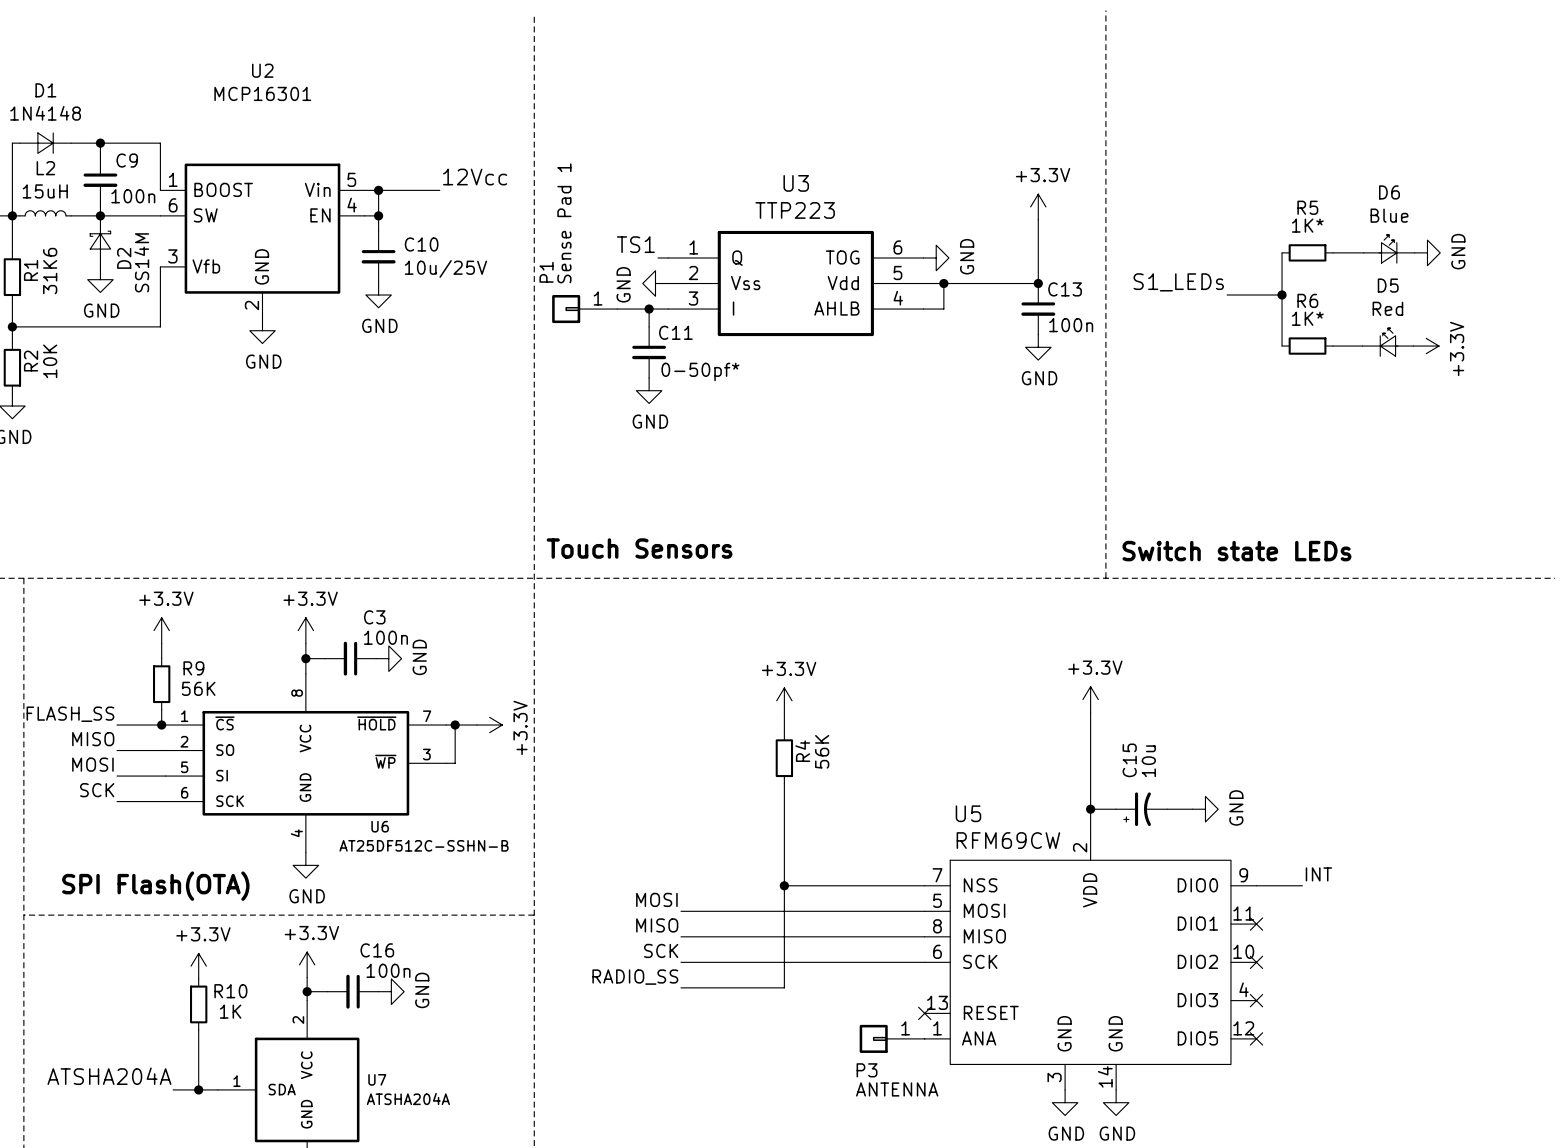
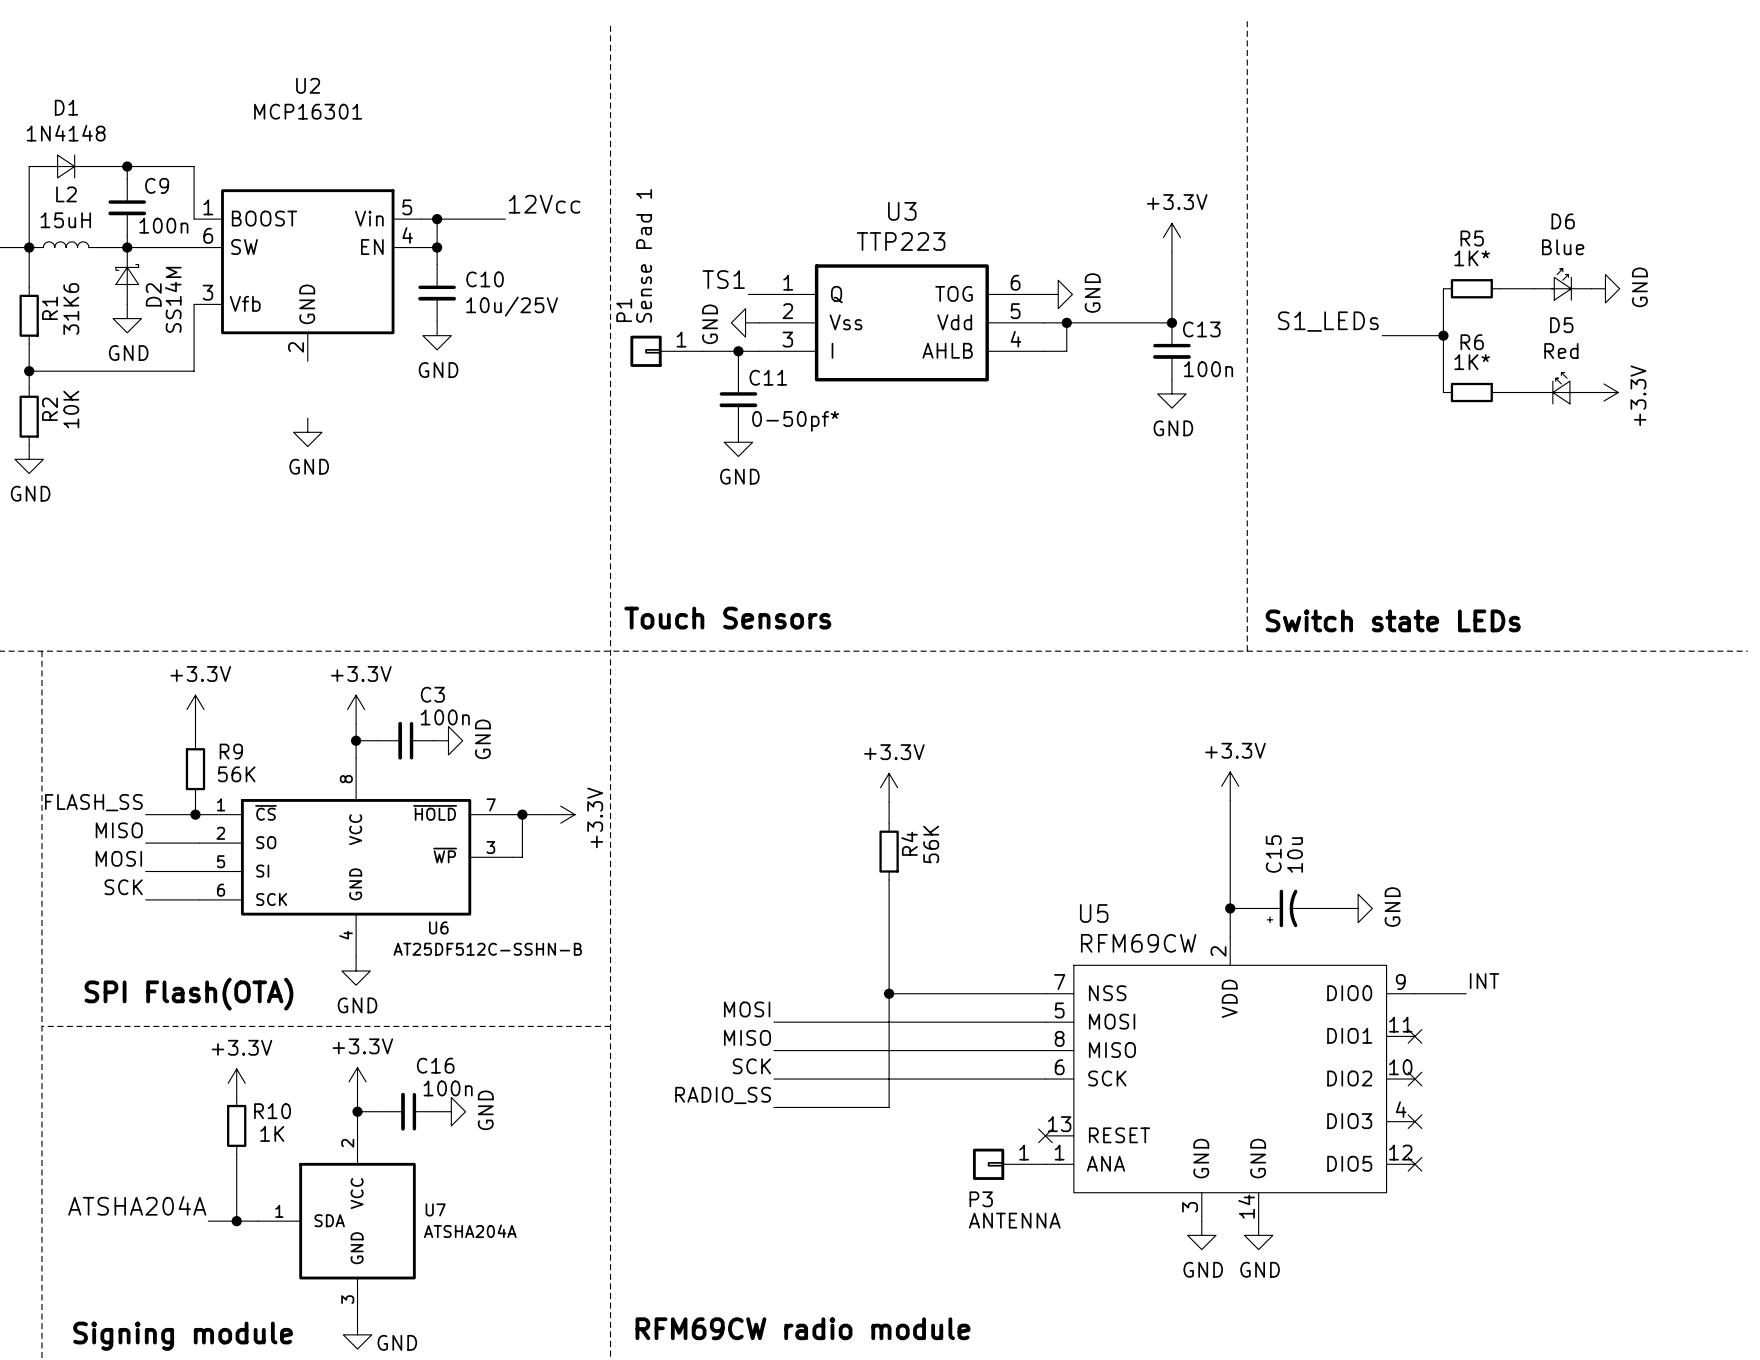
power symbol position: GND (262, 330) -> GND (307, 432)

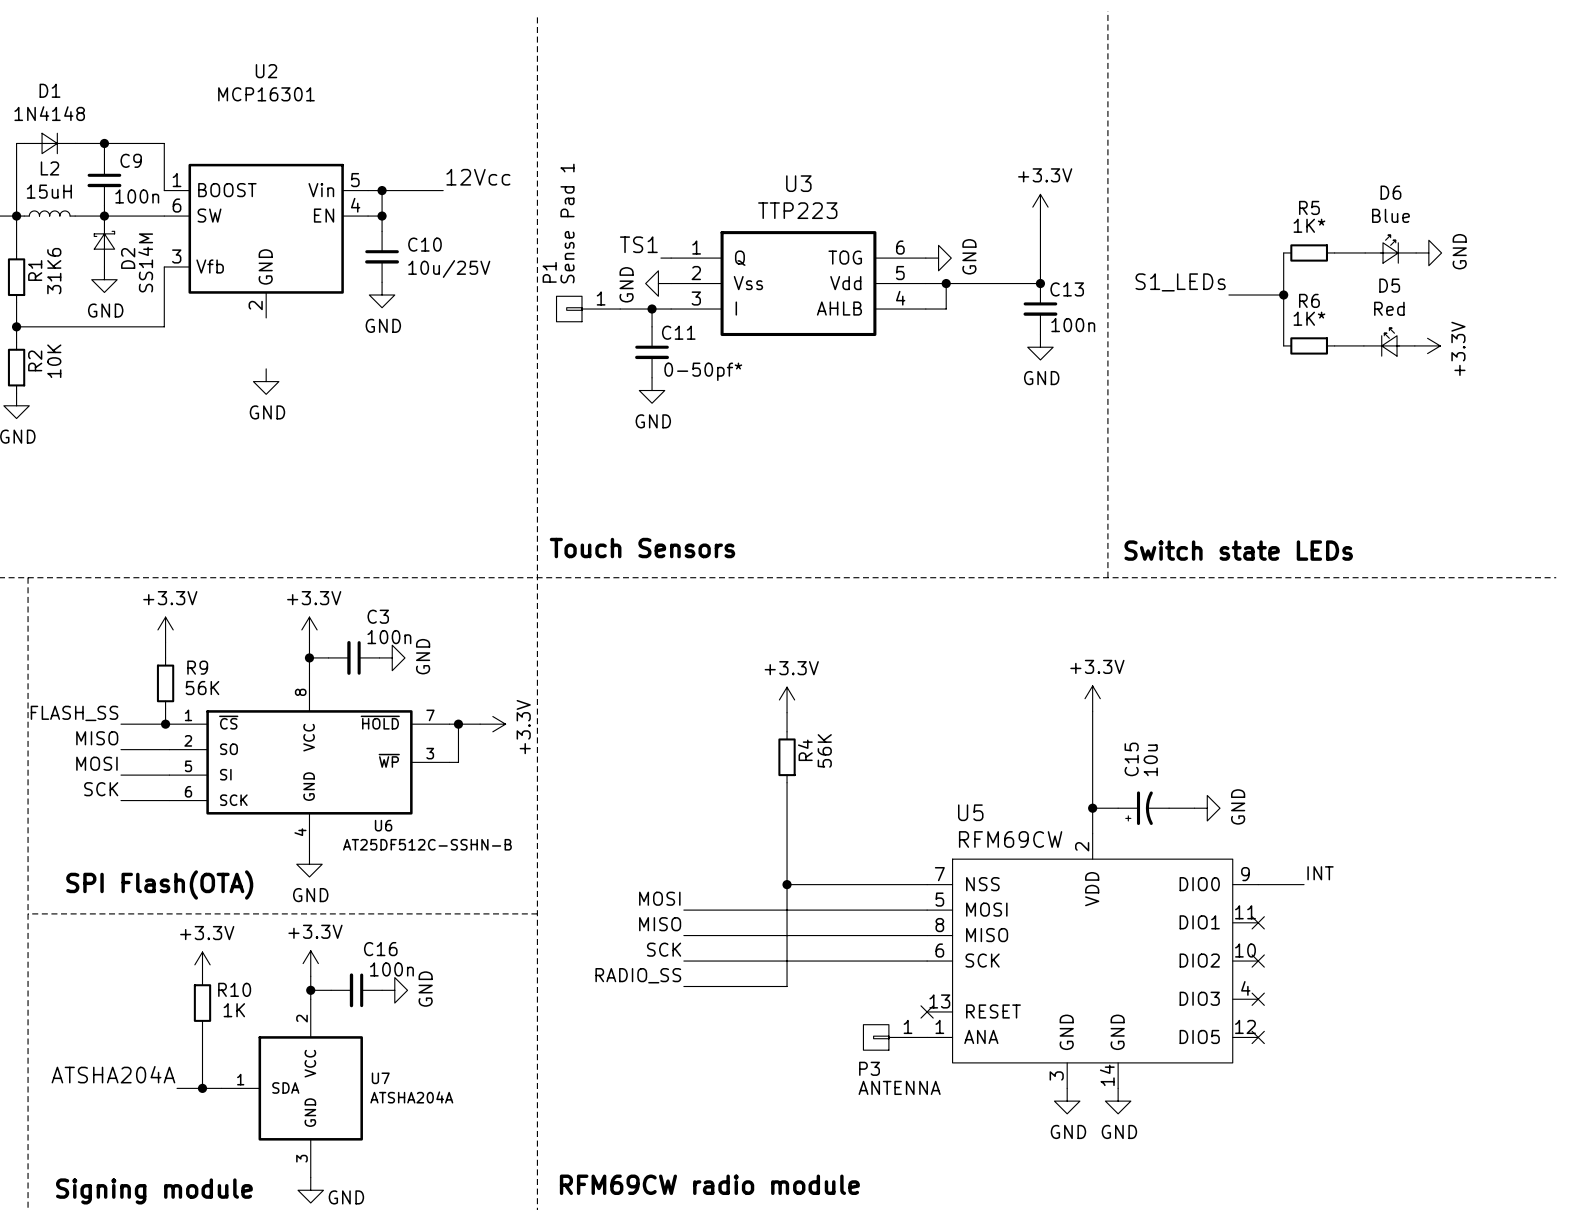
P1 symbol: [630, 335, 703, 367] -> [556, 296, 621, 322]
P3 symbol: [972, 1148, 1046, 1180] -> [863, 1024, 928, 1051]

